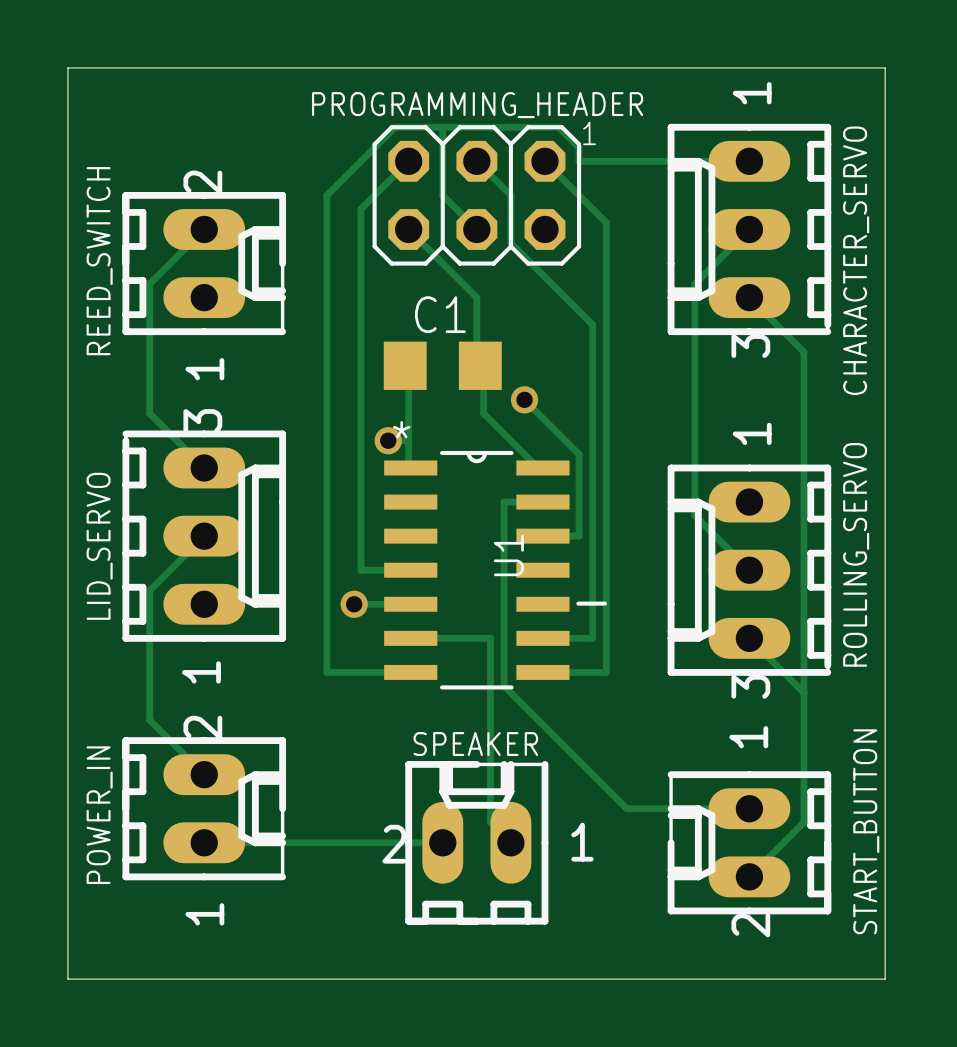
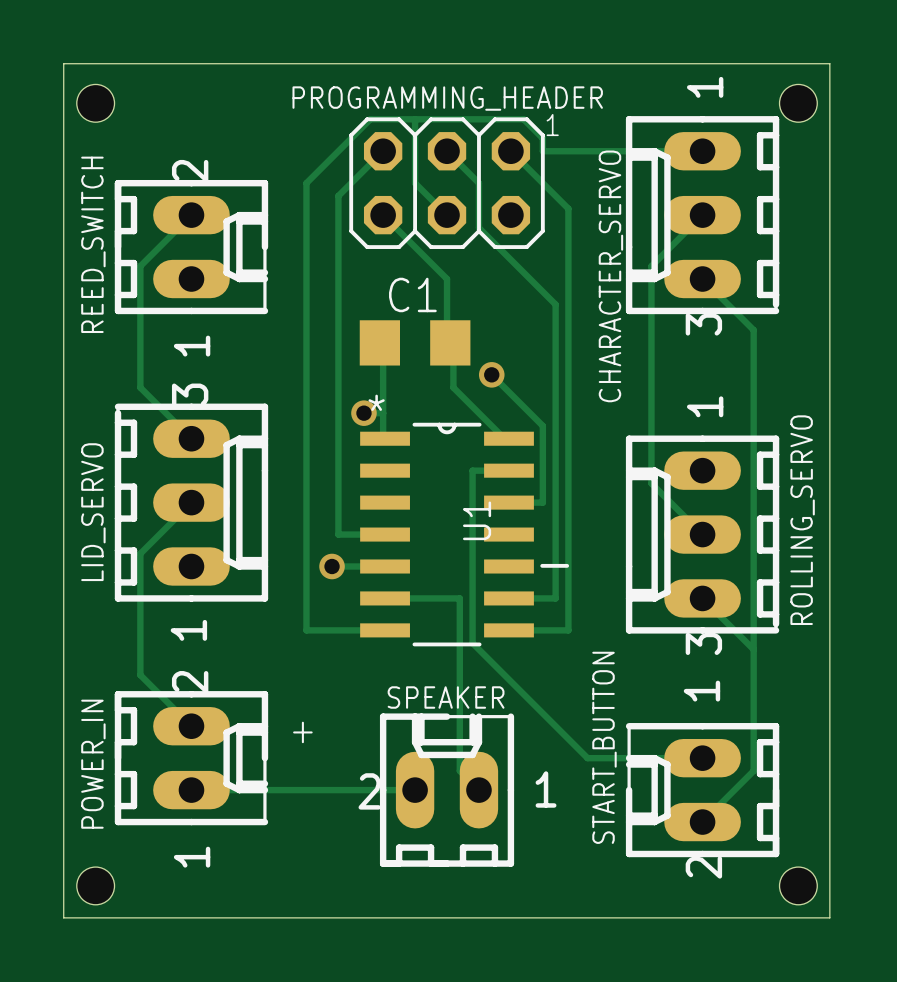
hole: none -> (95, 103)
hole: none -> (798, 103)
CHARACTER_SERVO name position: CHARACTER_SERVO (856, 260) -> CHARACTER_SERVO (610, 276)
text: none -> + (302, 732)
START_BUTTON name position: START_BUTTON (866, 831) -> START_BUTTON (604, 747)
hole: none -> (95, 885)
hole: none -> (798, 885)

